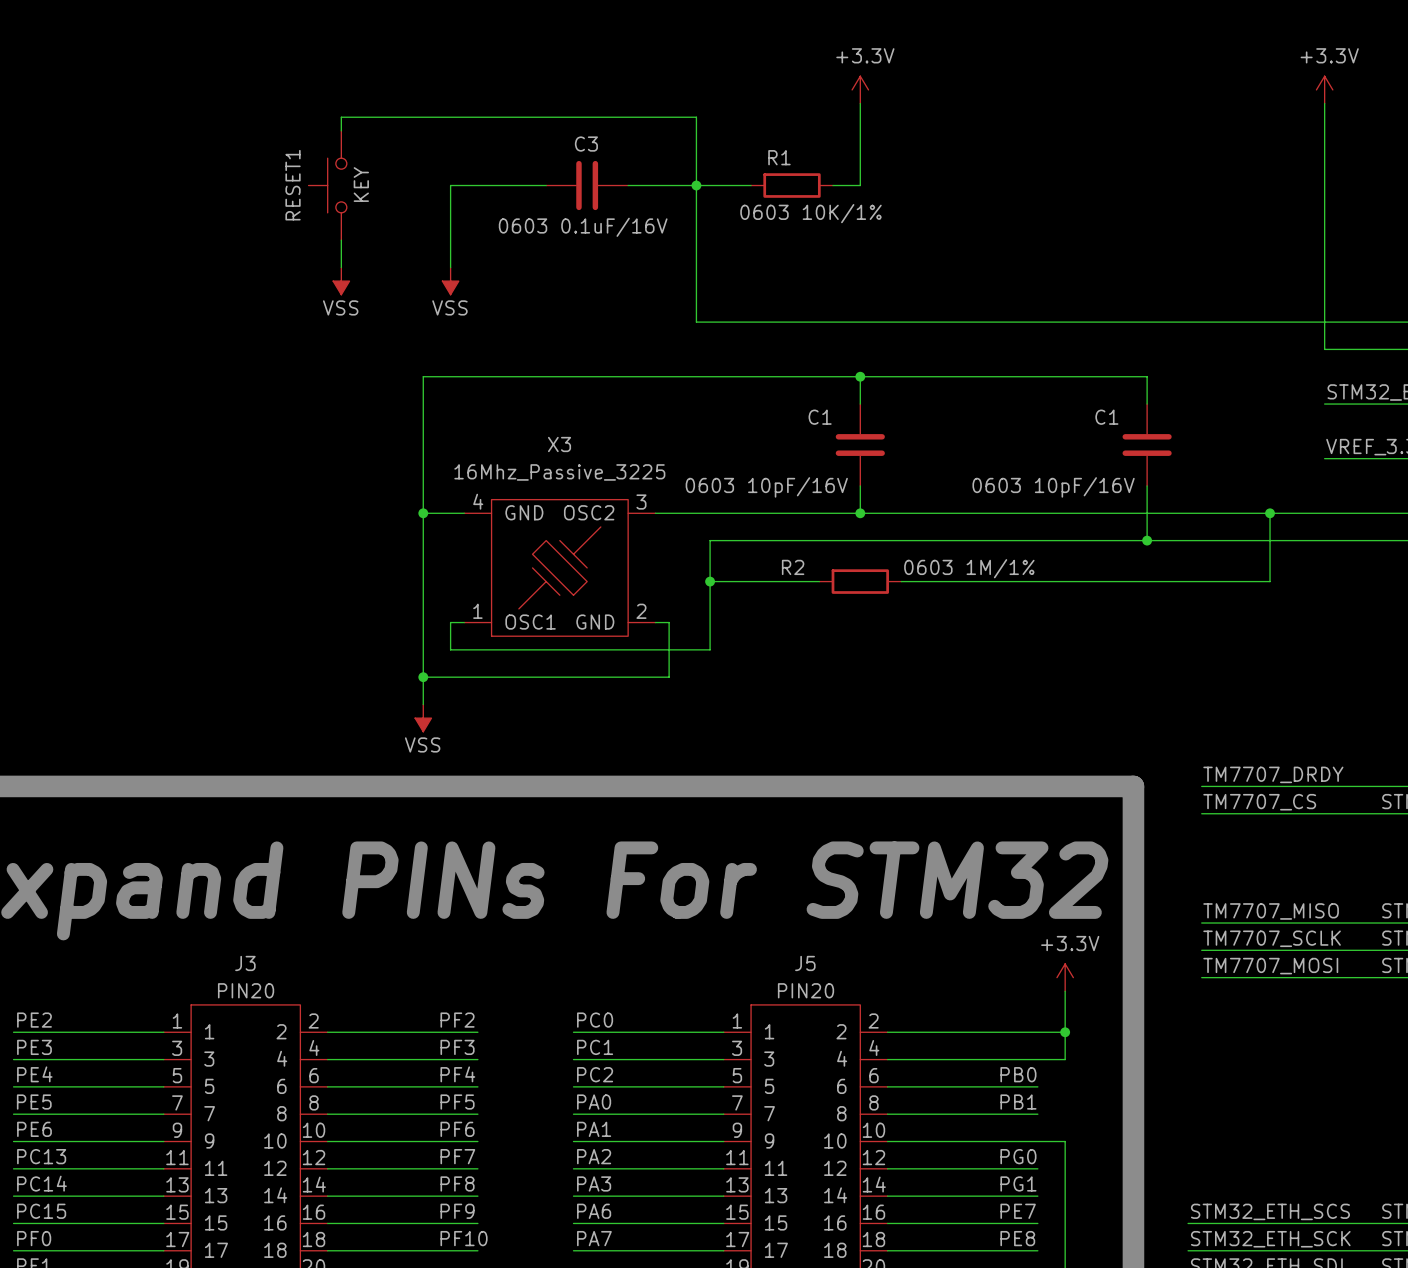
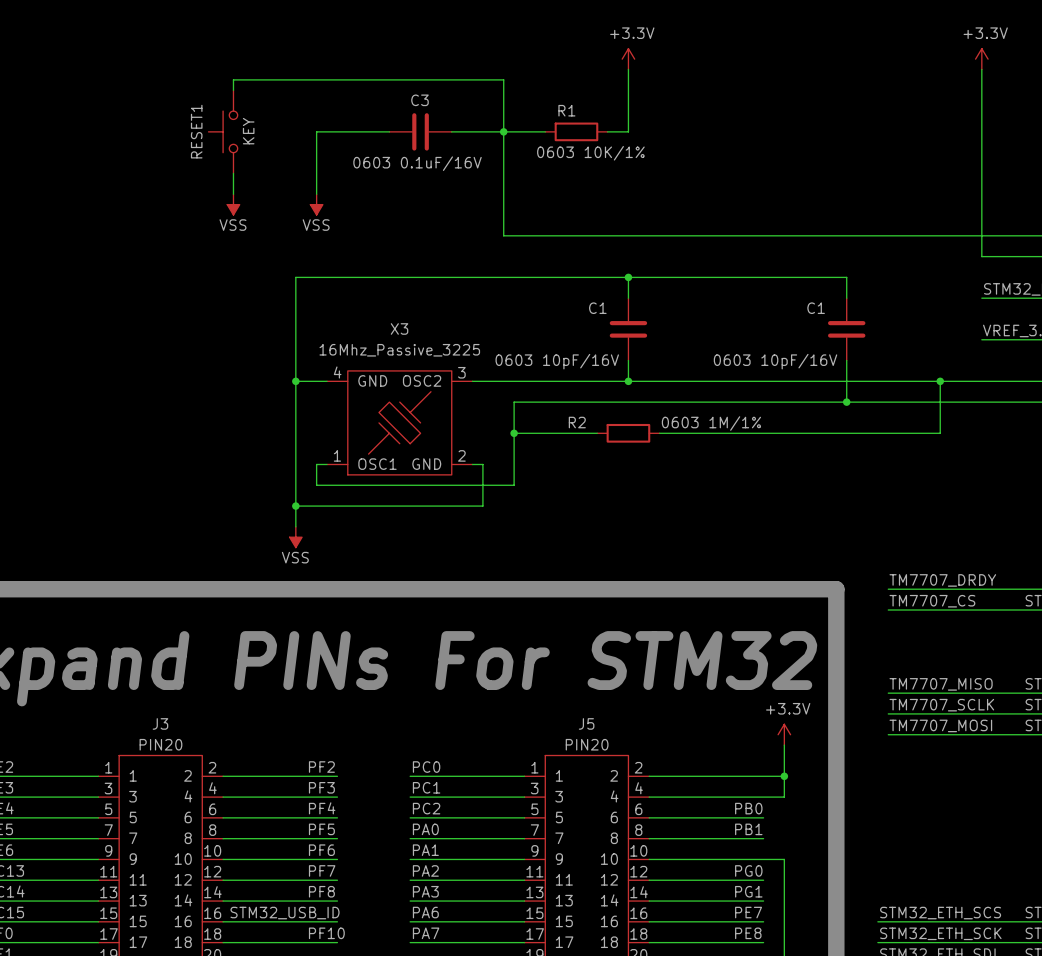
label: none -> STM32_USB_ID (285, 913)
label: PF9 (457, 1211) -> none

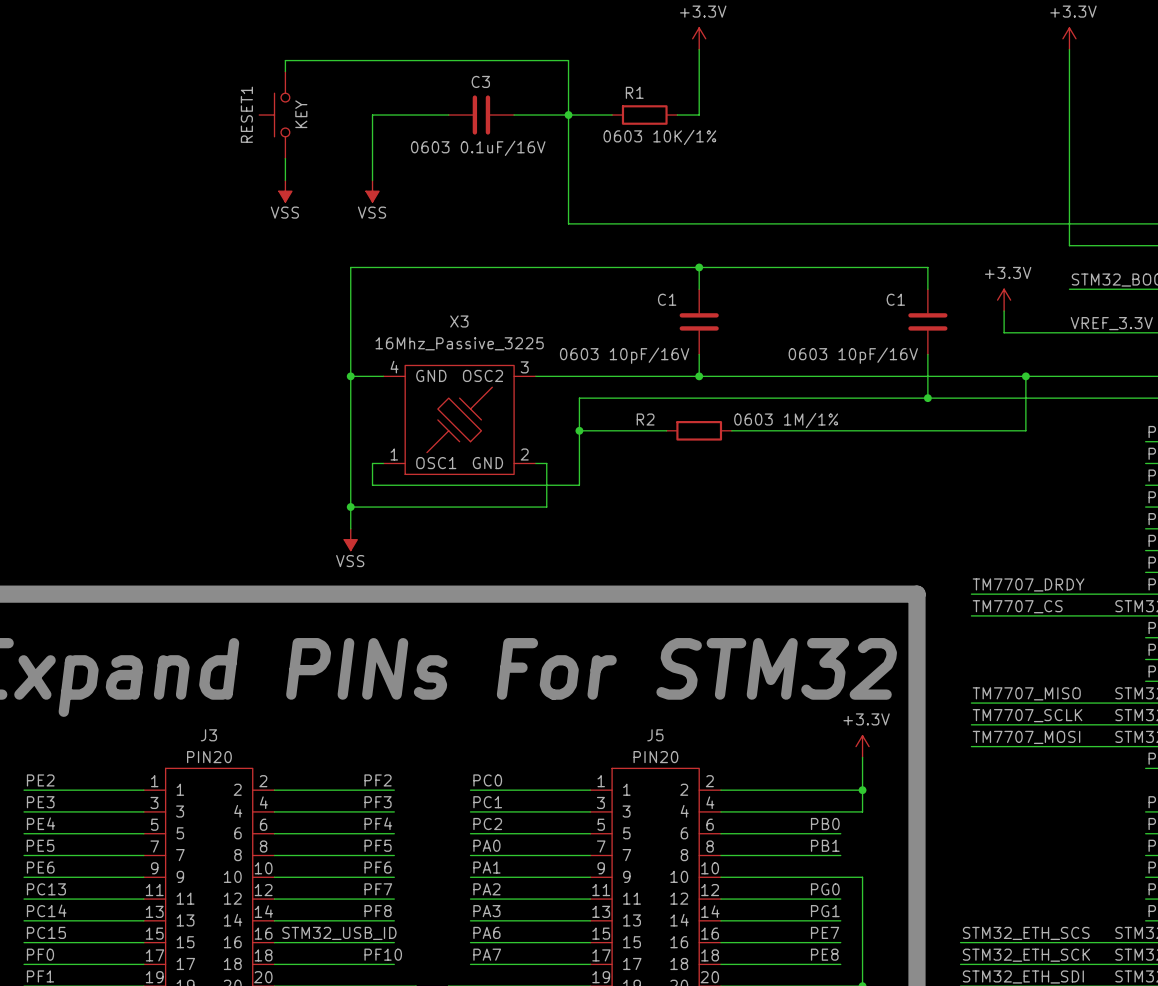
power symbol: none -> +3.3V (1004, 300)
wire: none -> (1004, 311) (1004, 332) (1069, 332)

